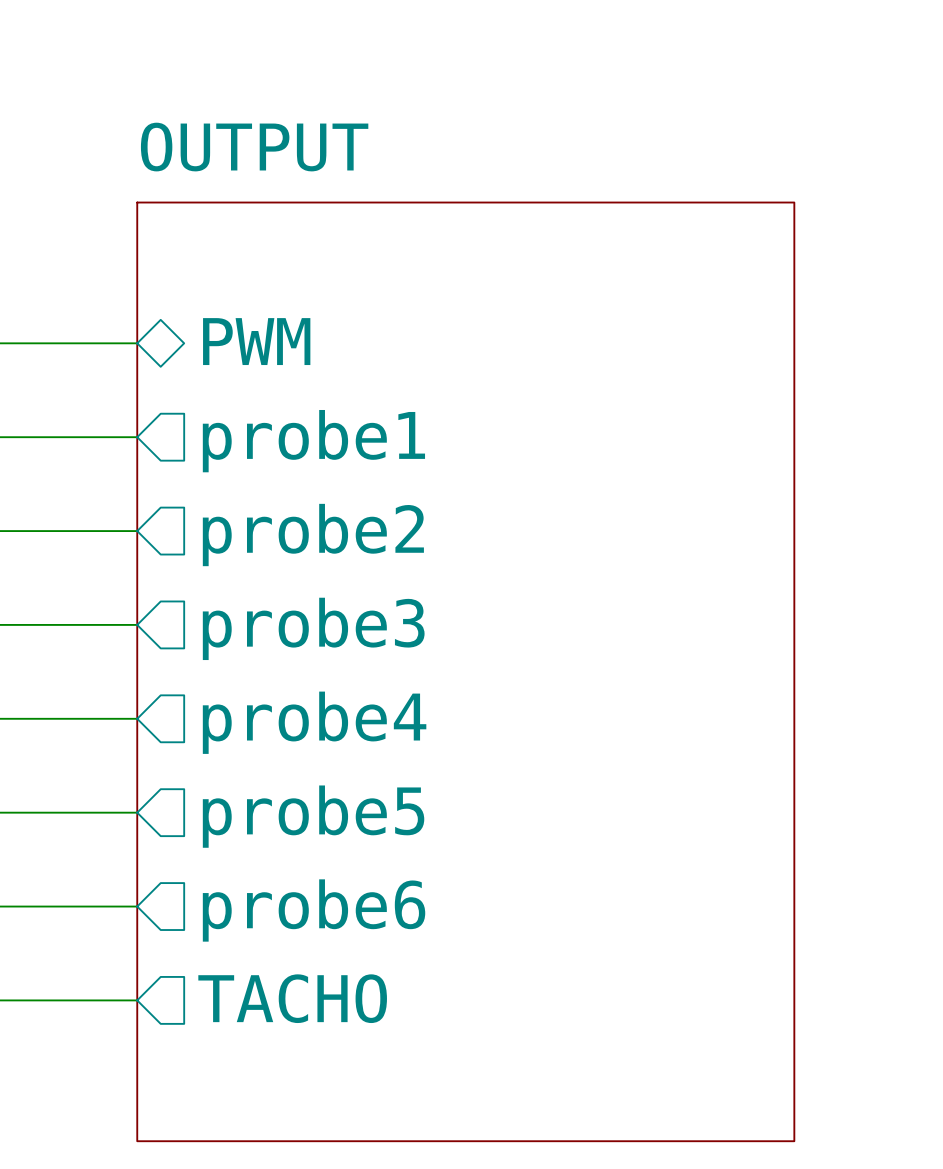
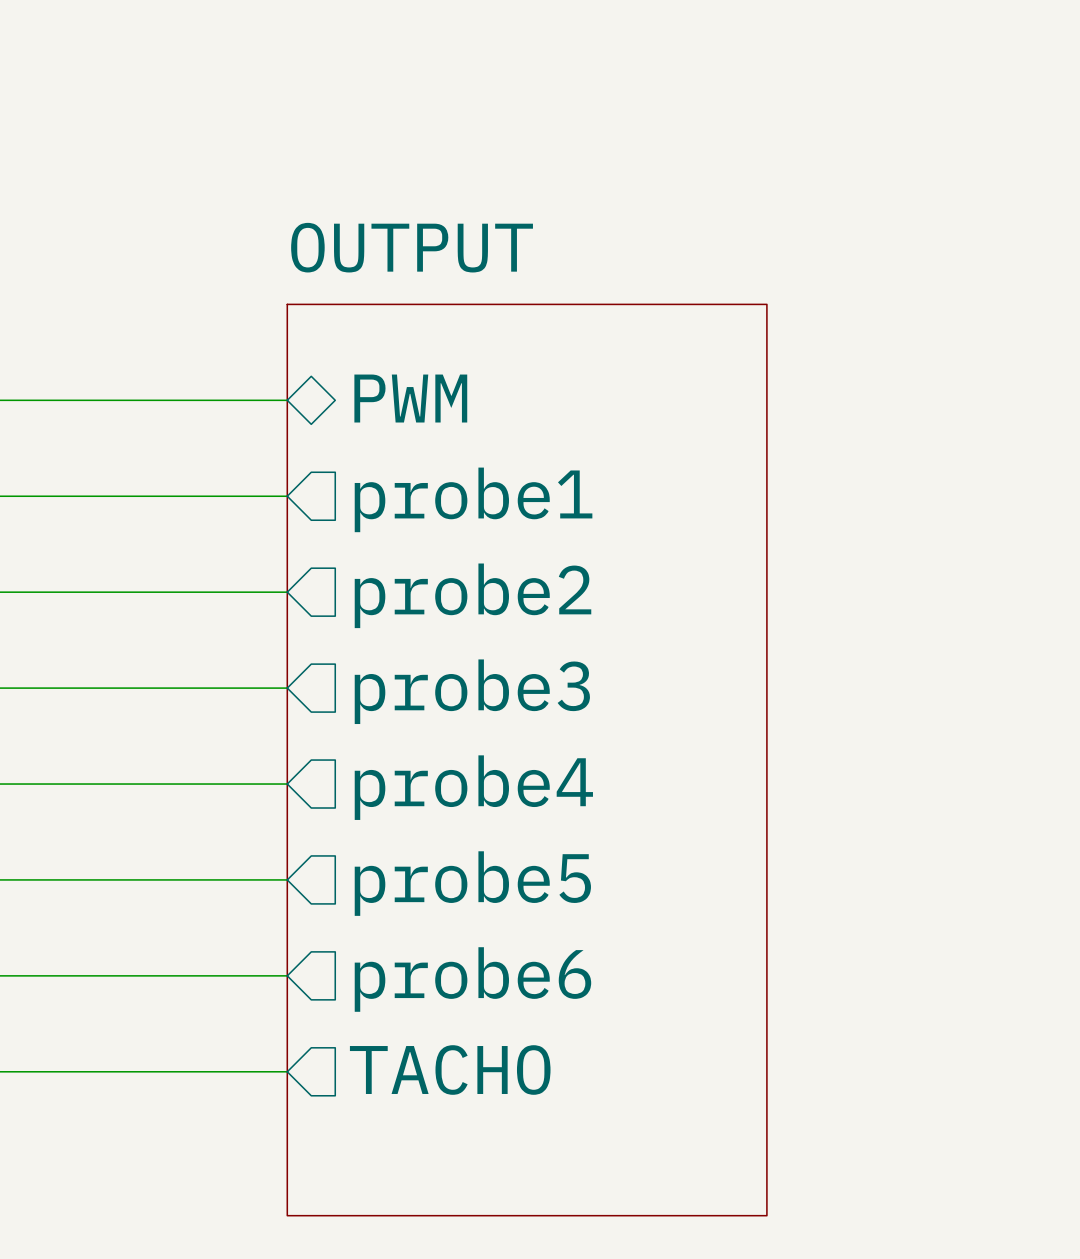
sheet OUTPUT: (465, 671) -> none
sheet OUTPUT: none -> (527, 760)

